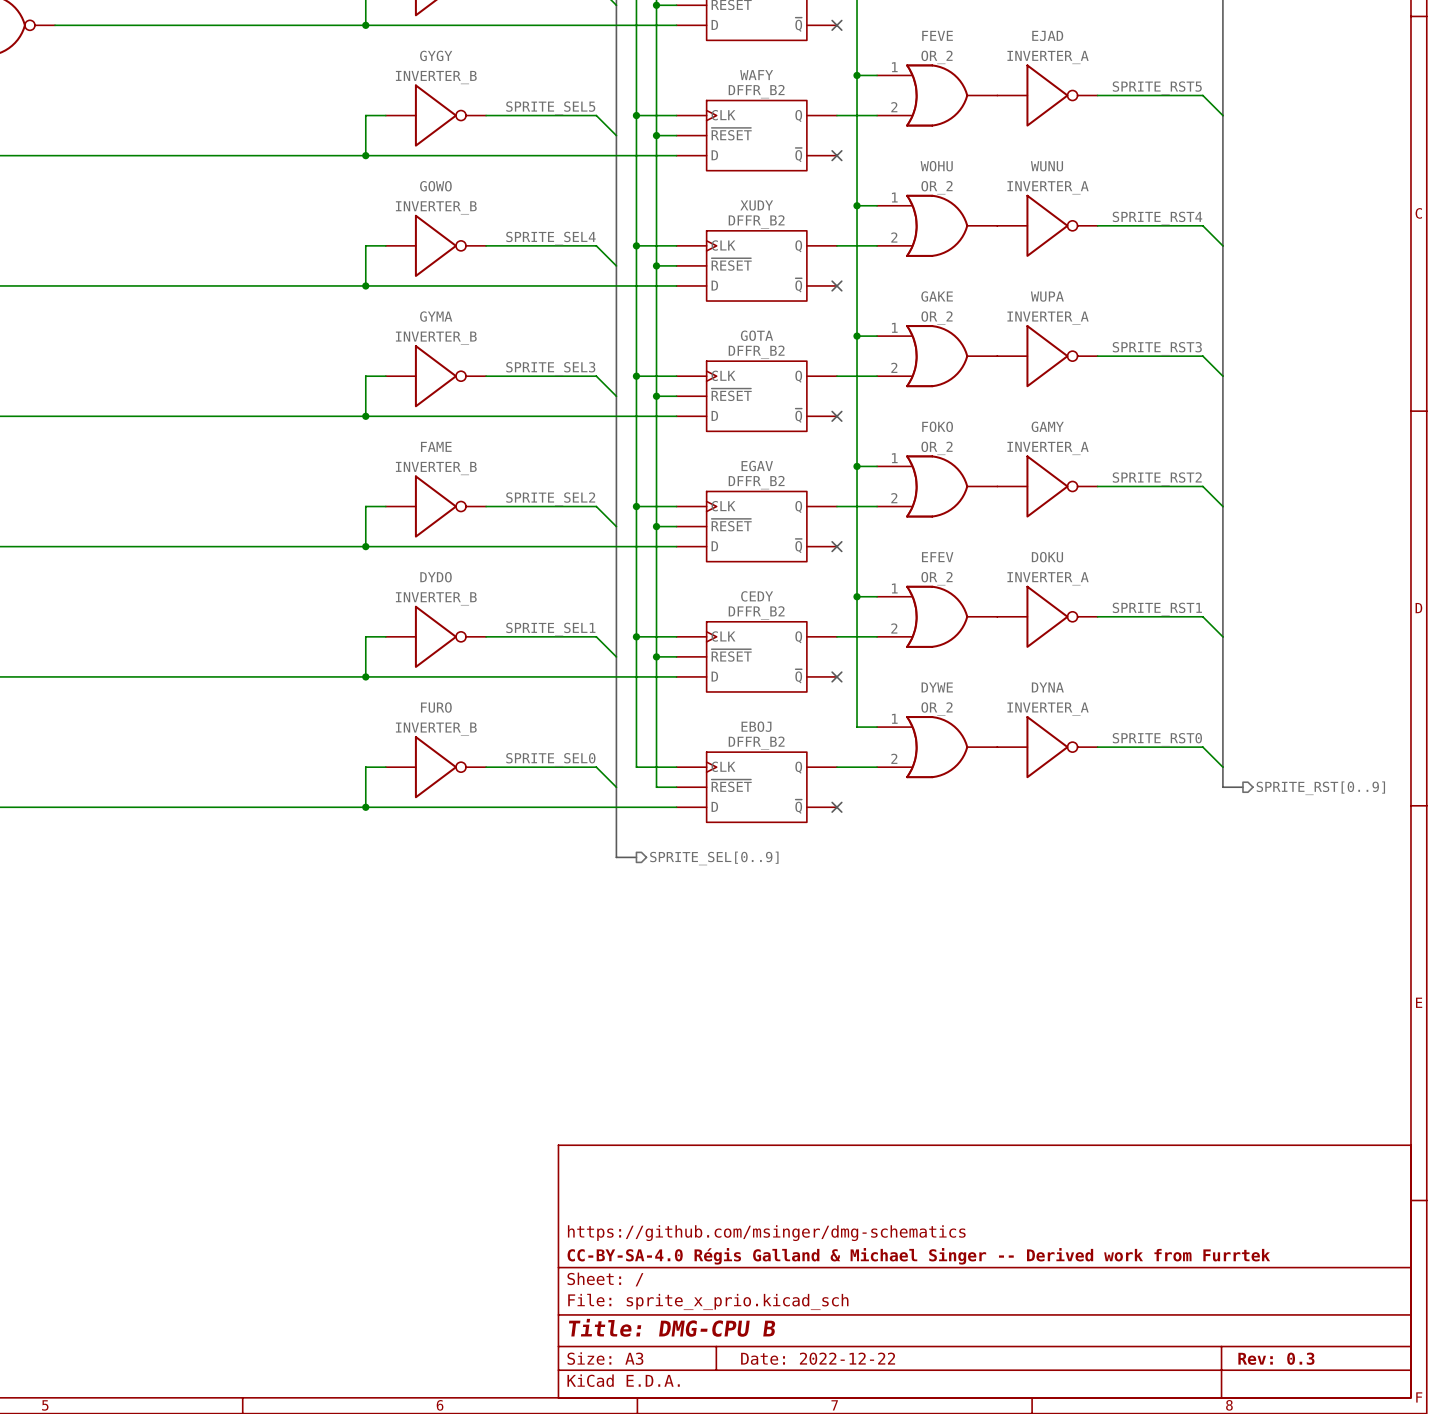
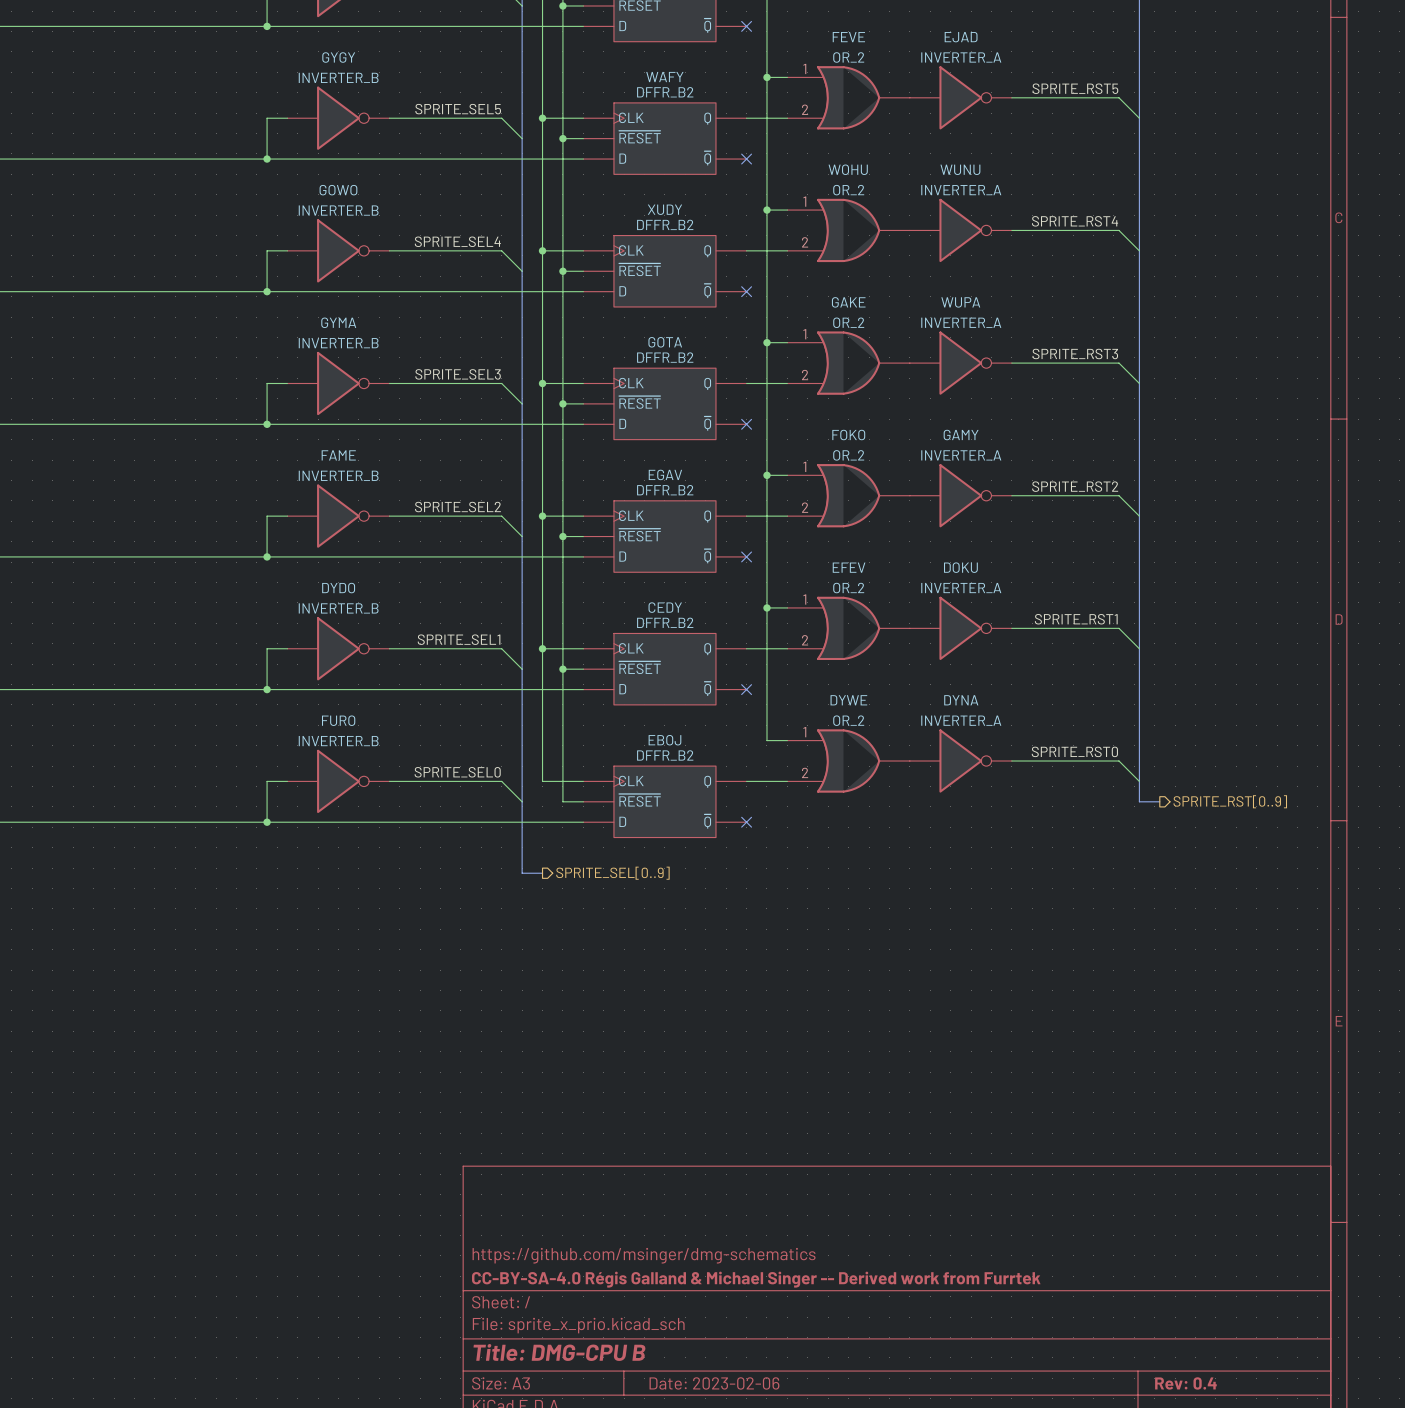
title block: Date: 2022-12-22 (818, 1358) -> Date: 2023-02-06 (714, 1383)
title block: Rev: 0.3 (1276, 1358) -> Rev: 0.4 (1185, 1383)

